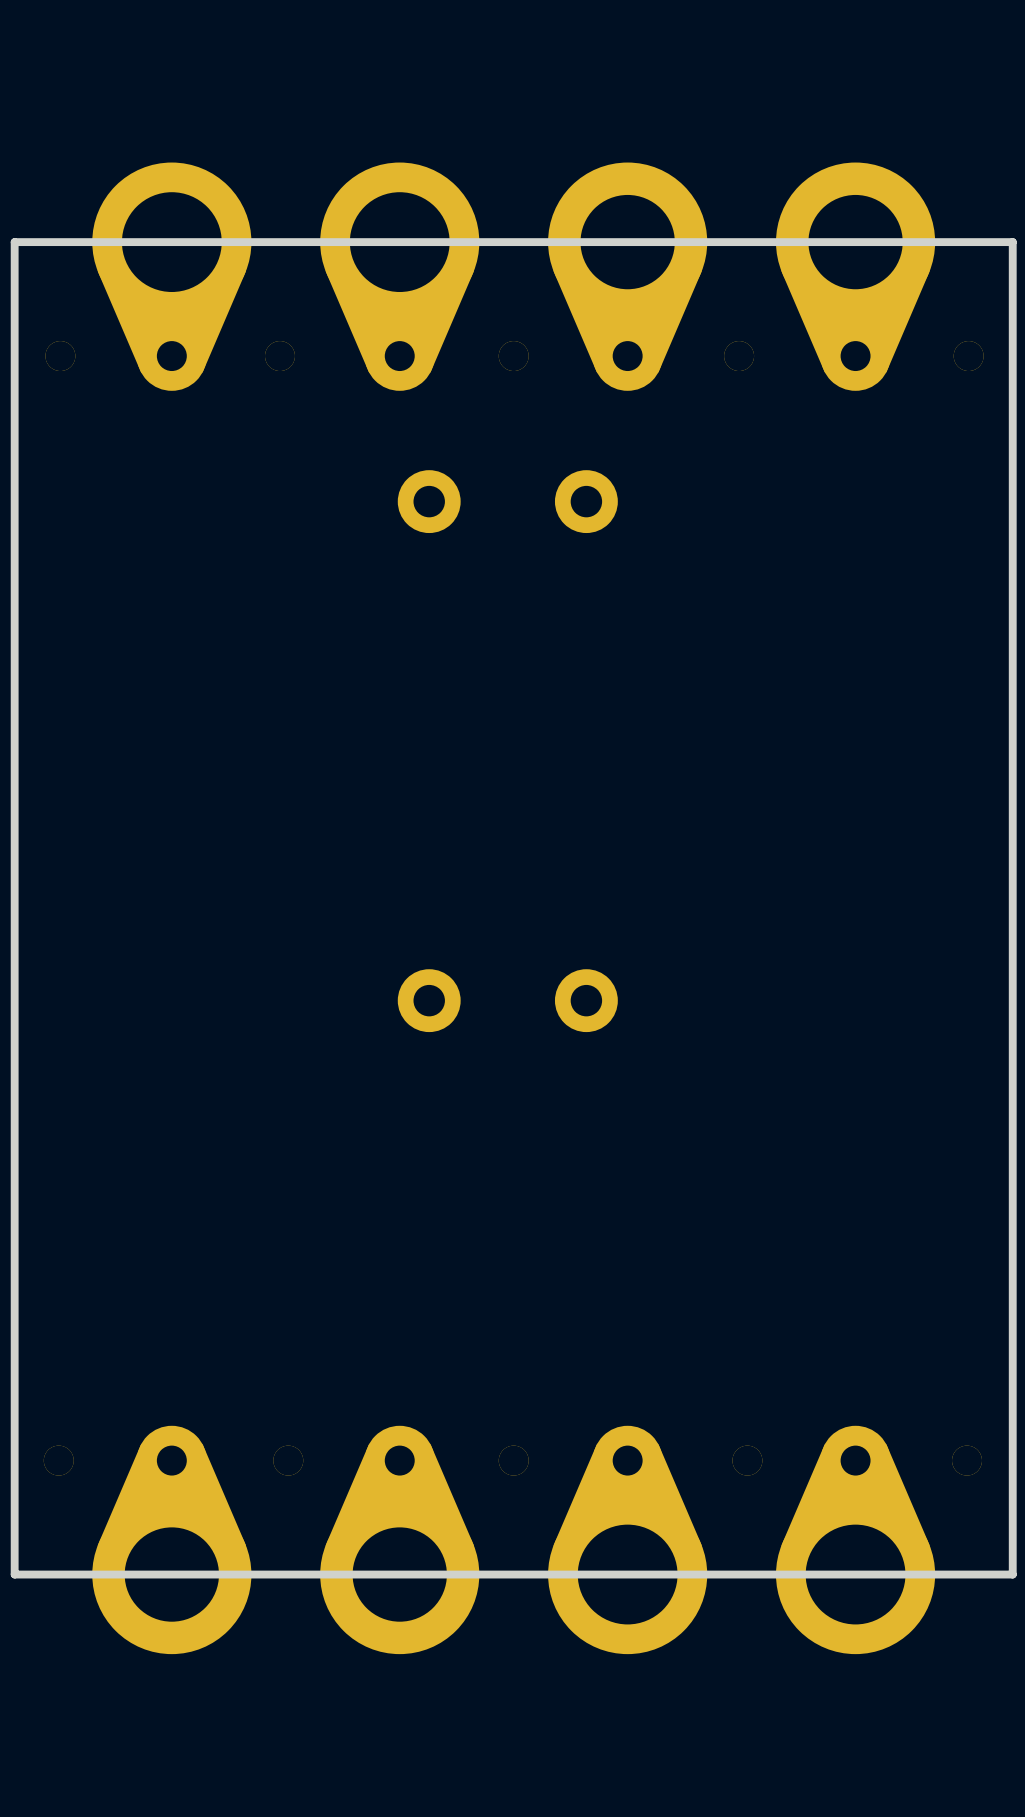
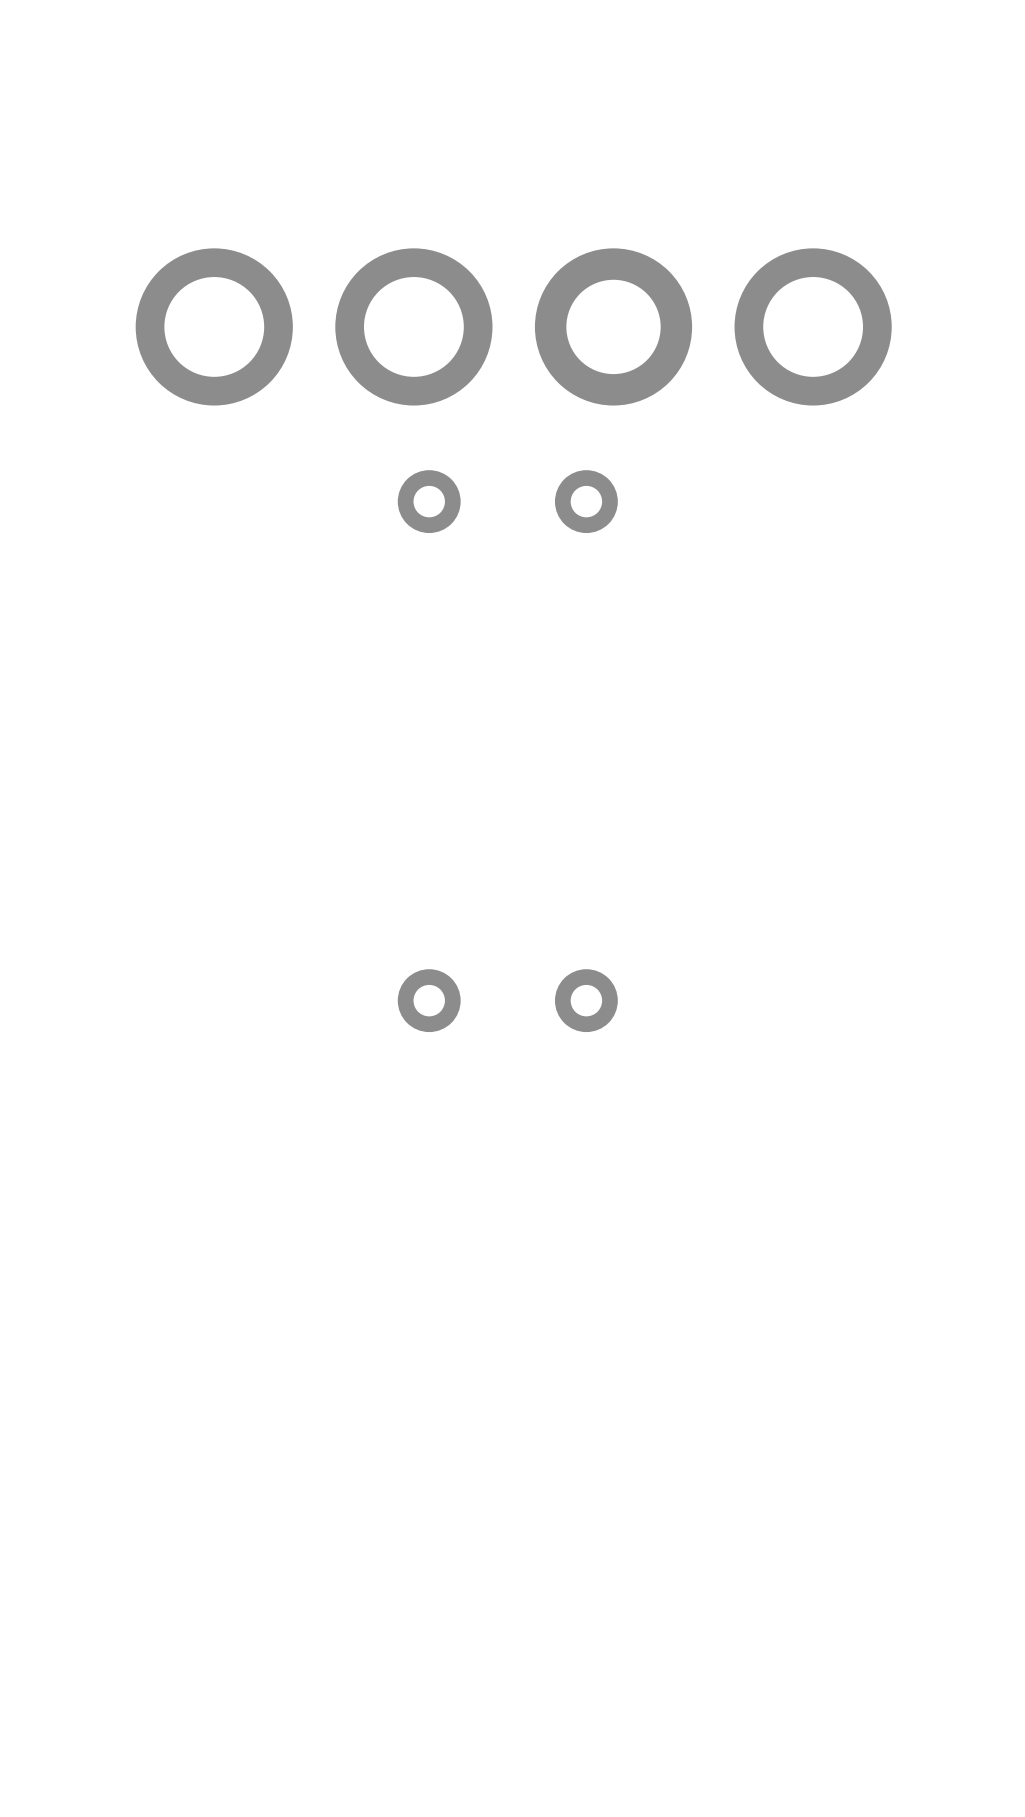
board edge: (1012, 242) (1012, 1574) (14, 1574) (14, 242) (1012, 242) -> none
part: (514, 276) -> none
part: none -> (513, 326)
part: (512, 1539) -> none

